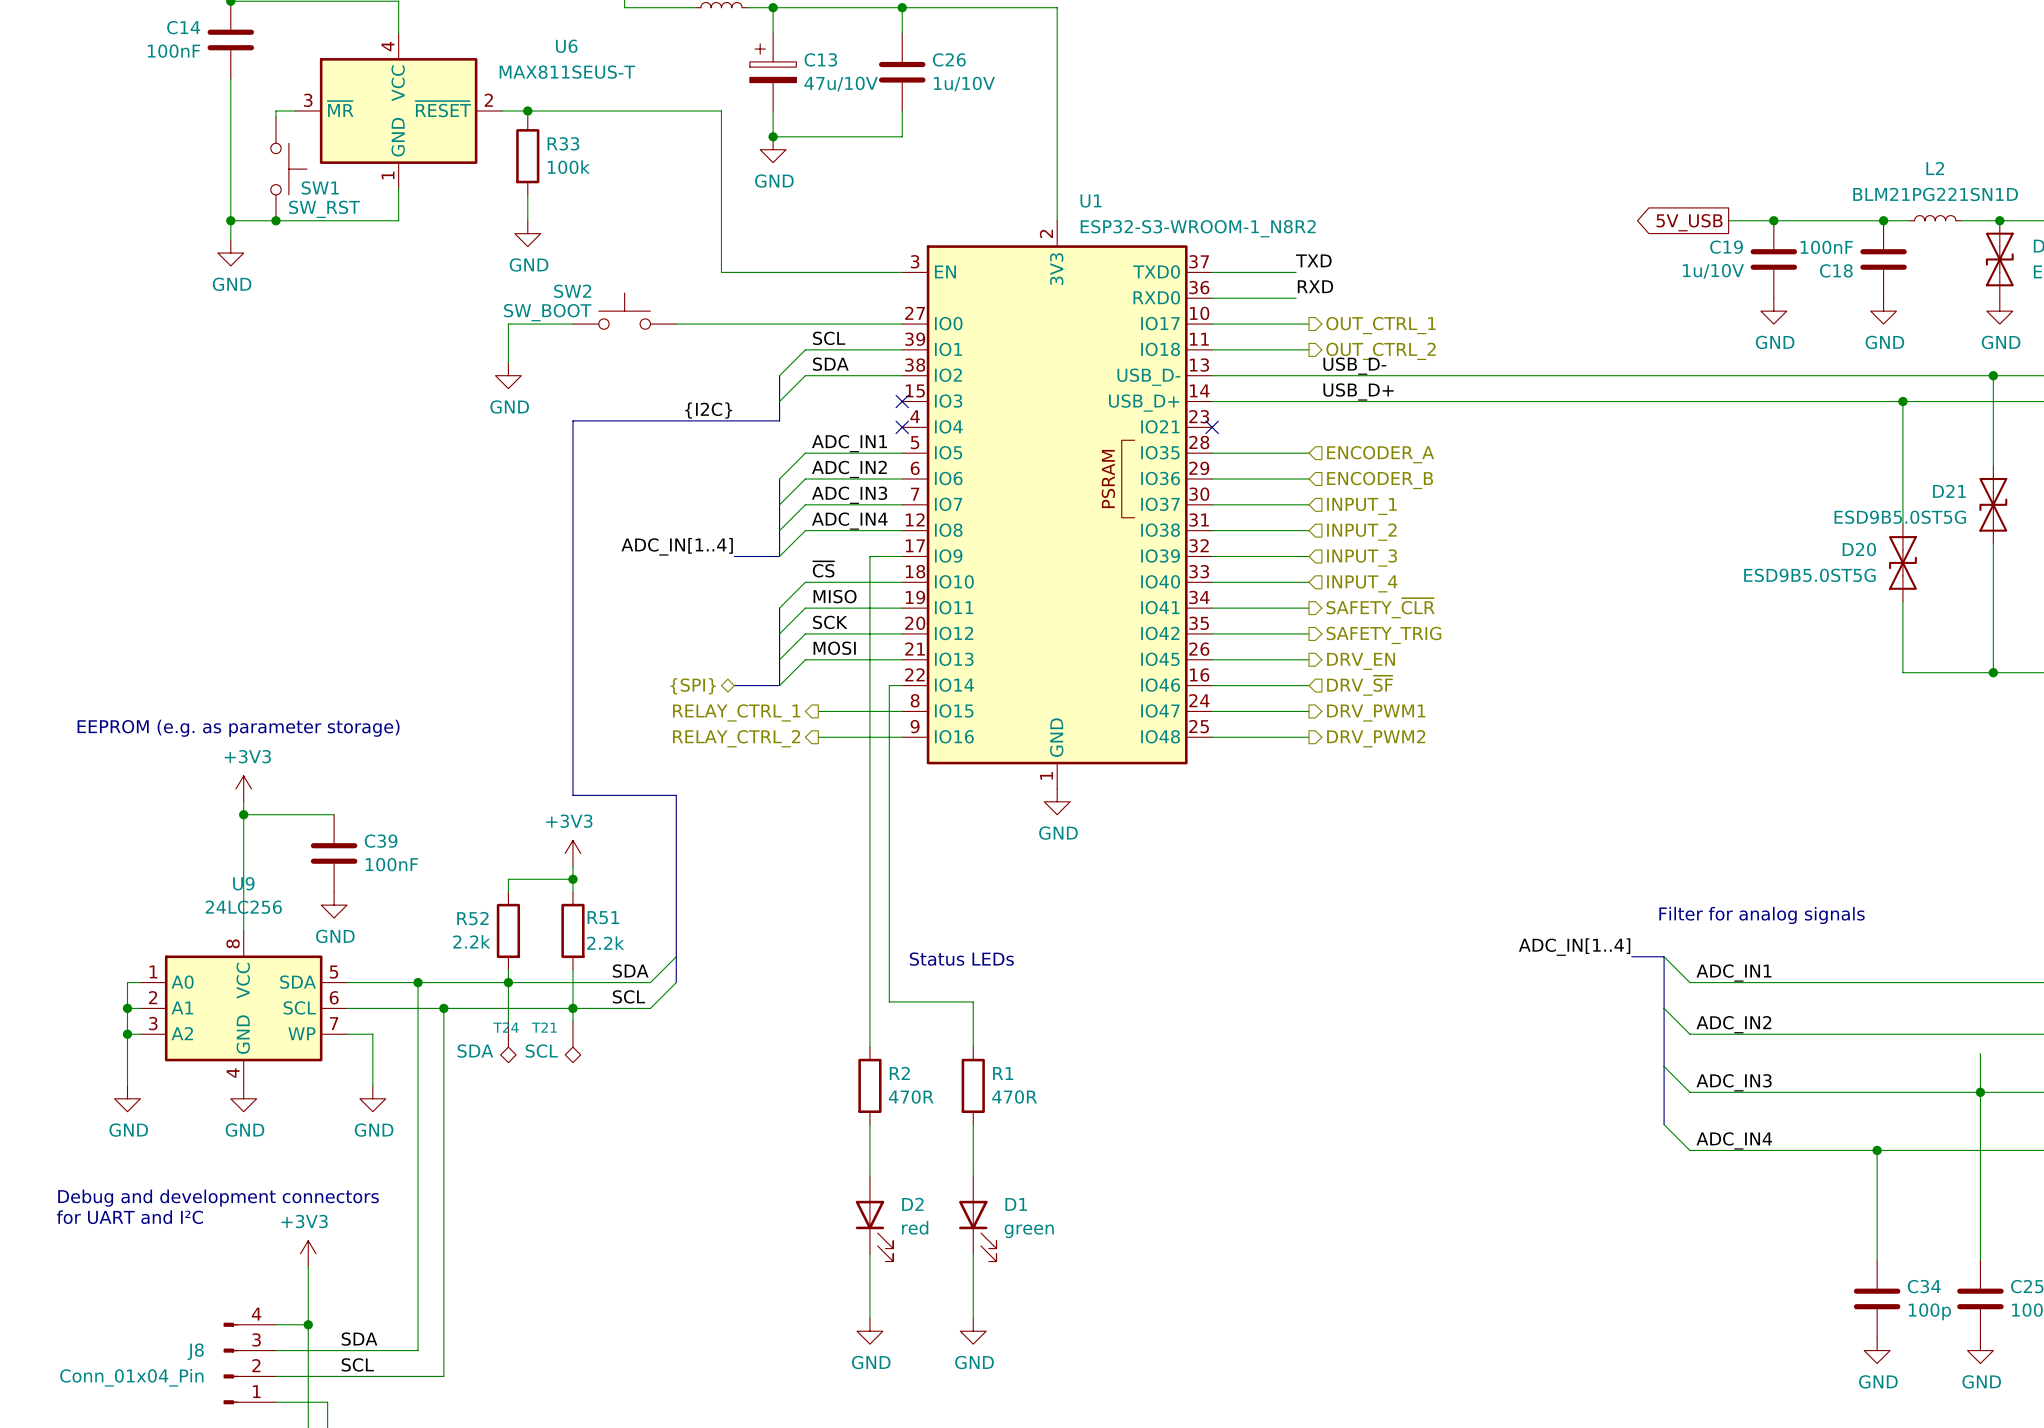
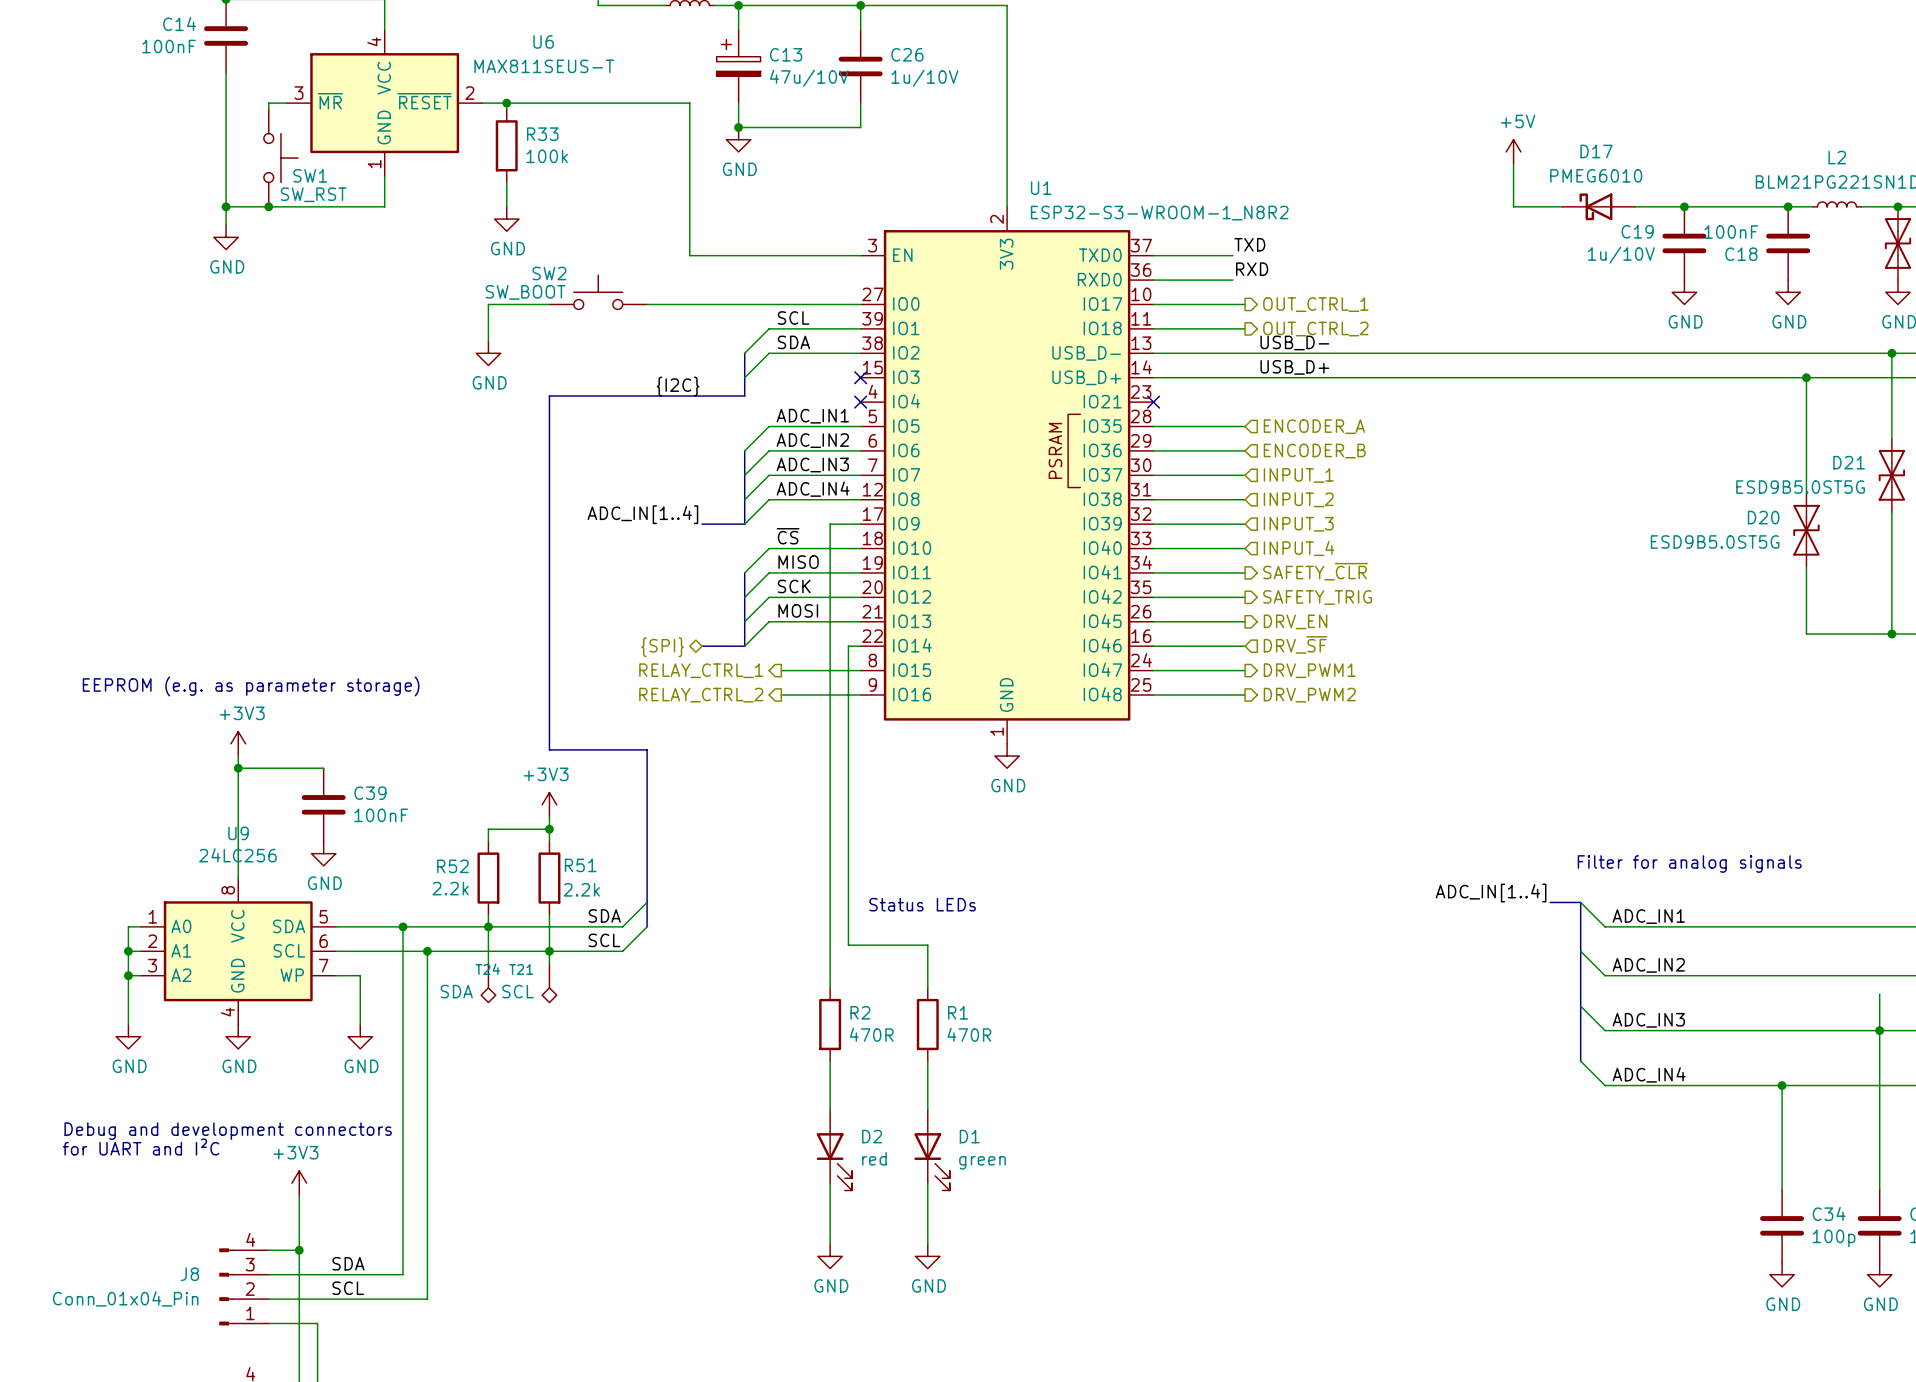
power symbol: none -> +5V (1513, 151)
wire: none -> (1513, 164) (1513, 206) (1562, 206)
D17: none -> PMEG6010 (1598, 206)
wire: none -> (1635, 206) (1641, 206)
global label: 5V_USB (1689, 222) -> none

